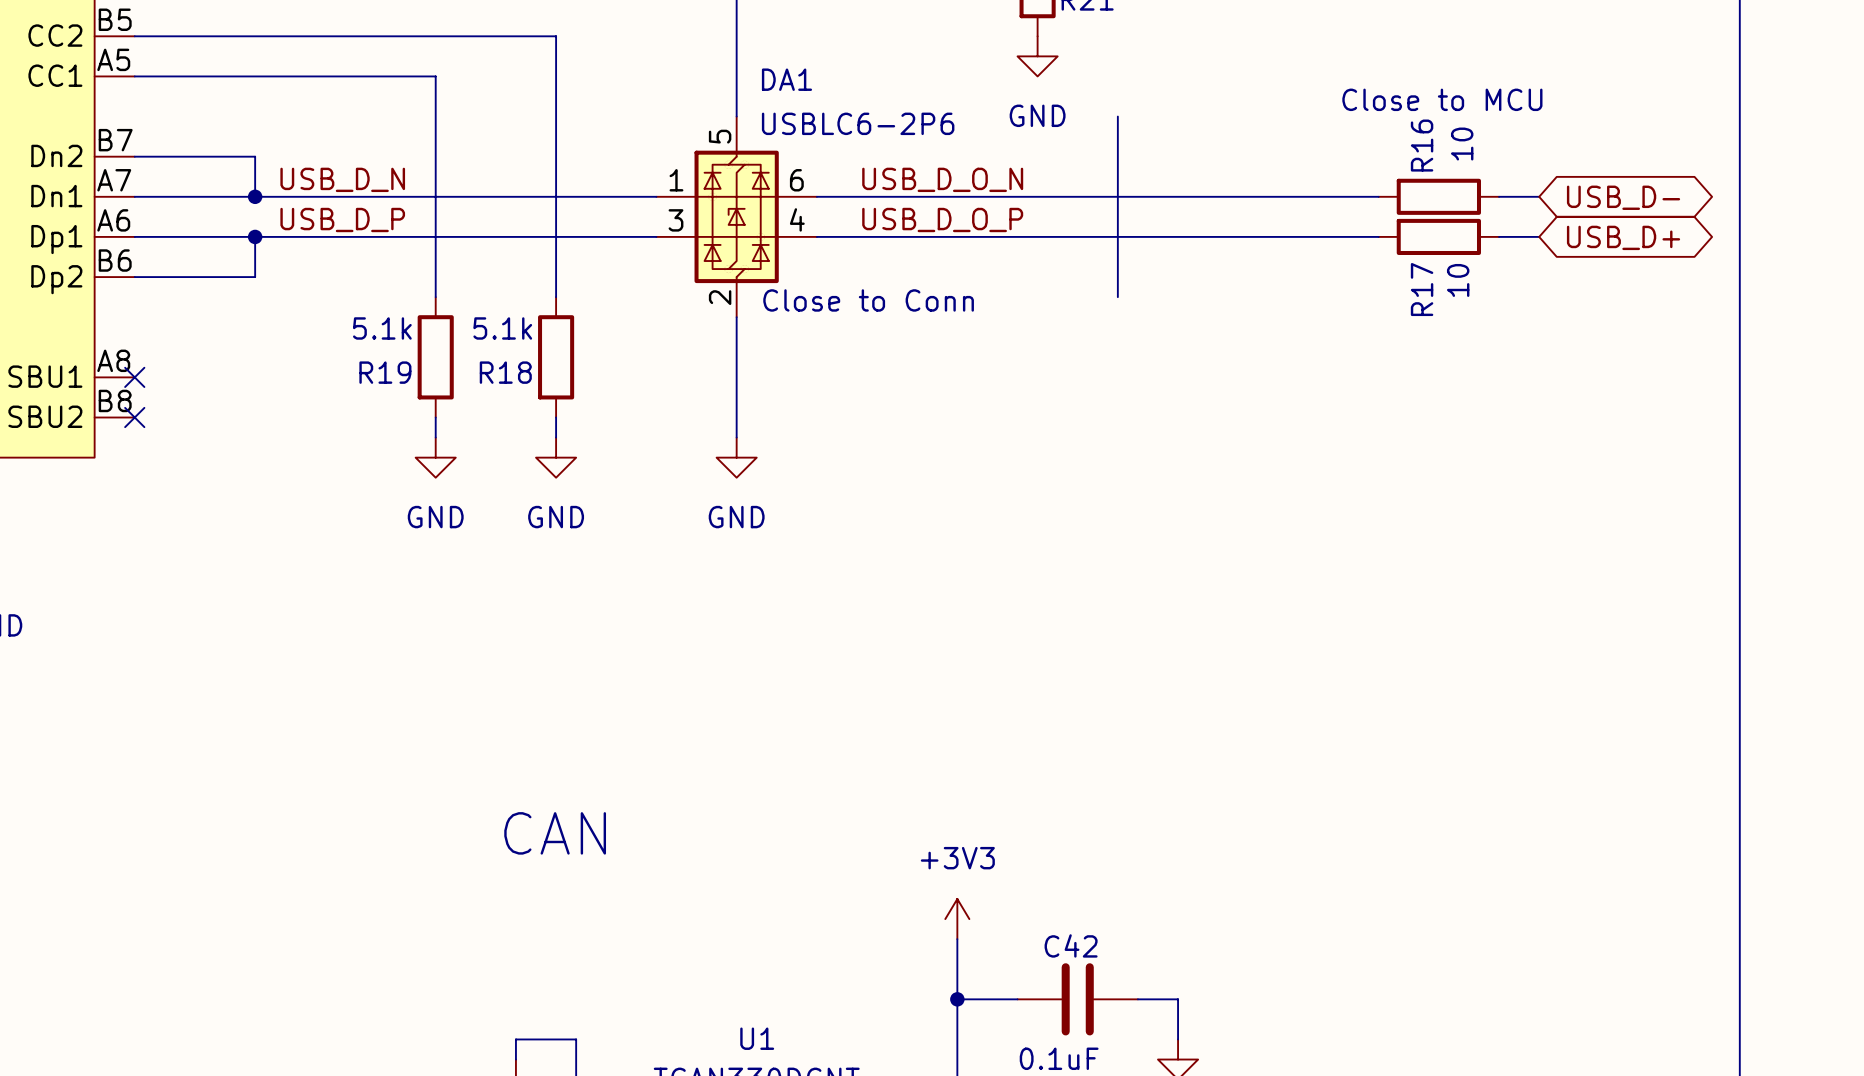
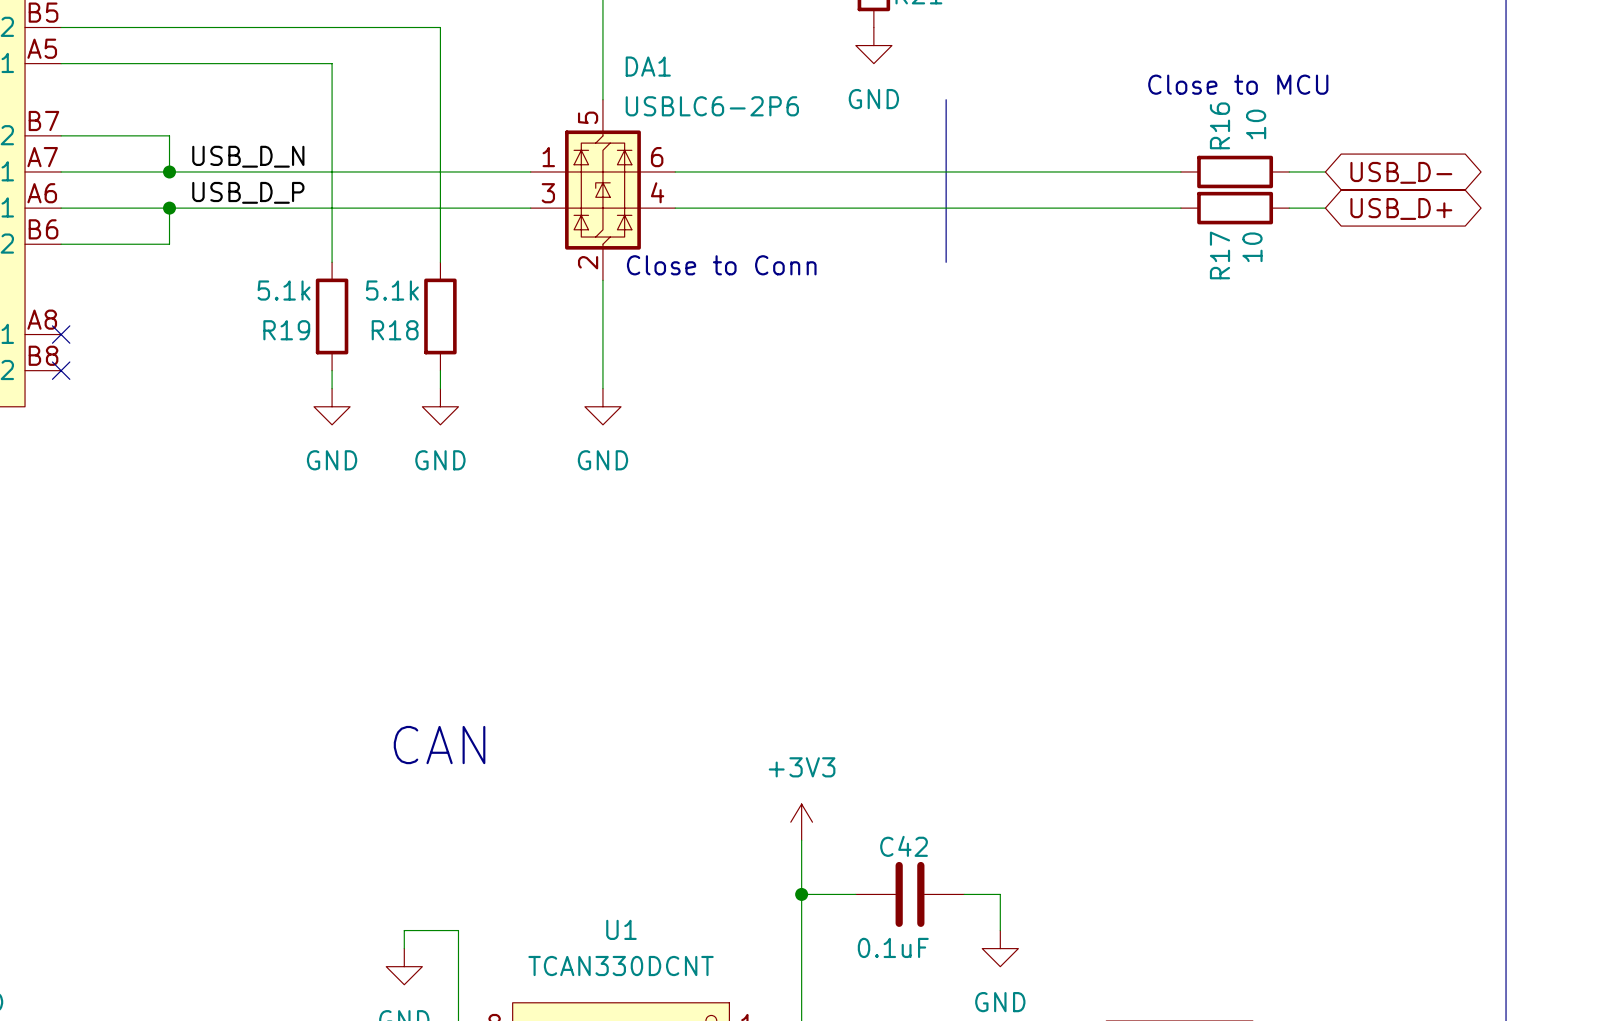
label: USB_D_O_N (942, 179) -> none
label: USB_D_O_P (942, 219) -> none

